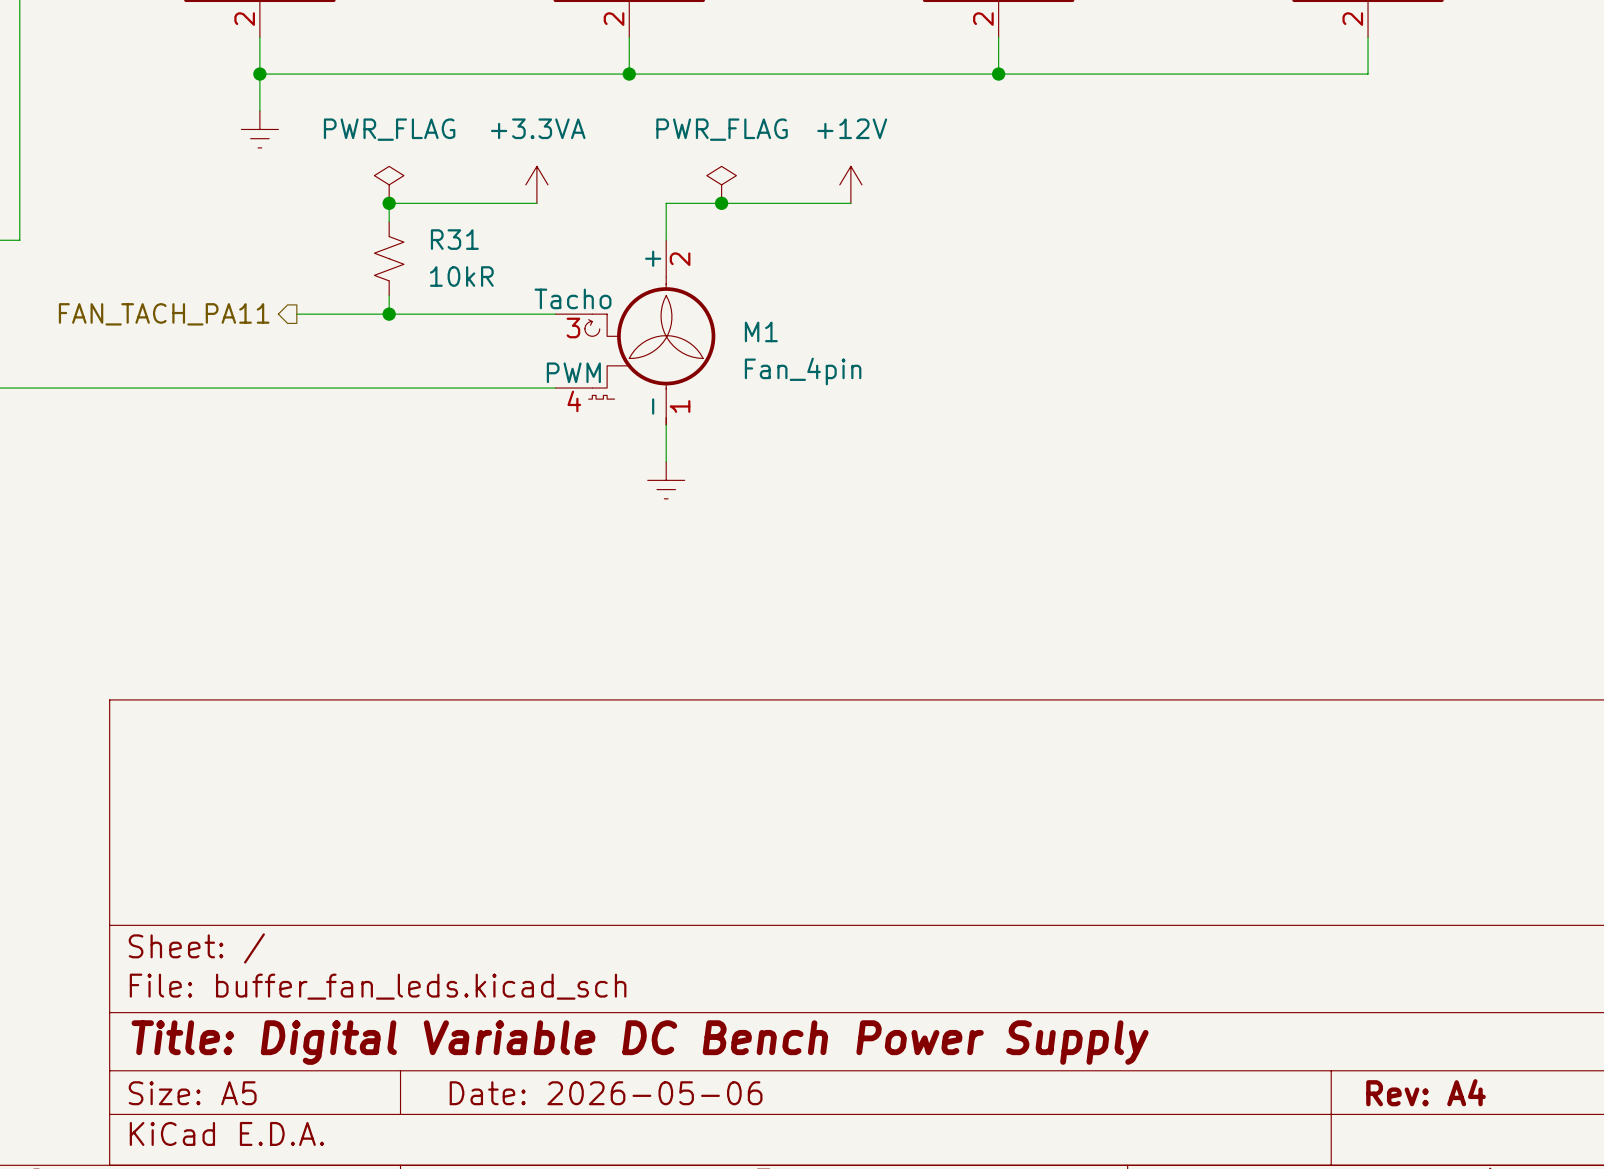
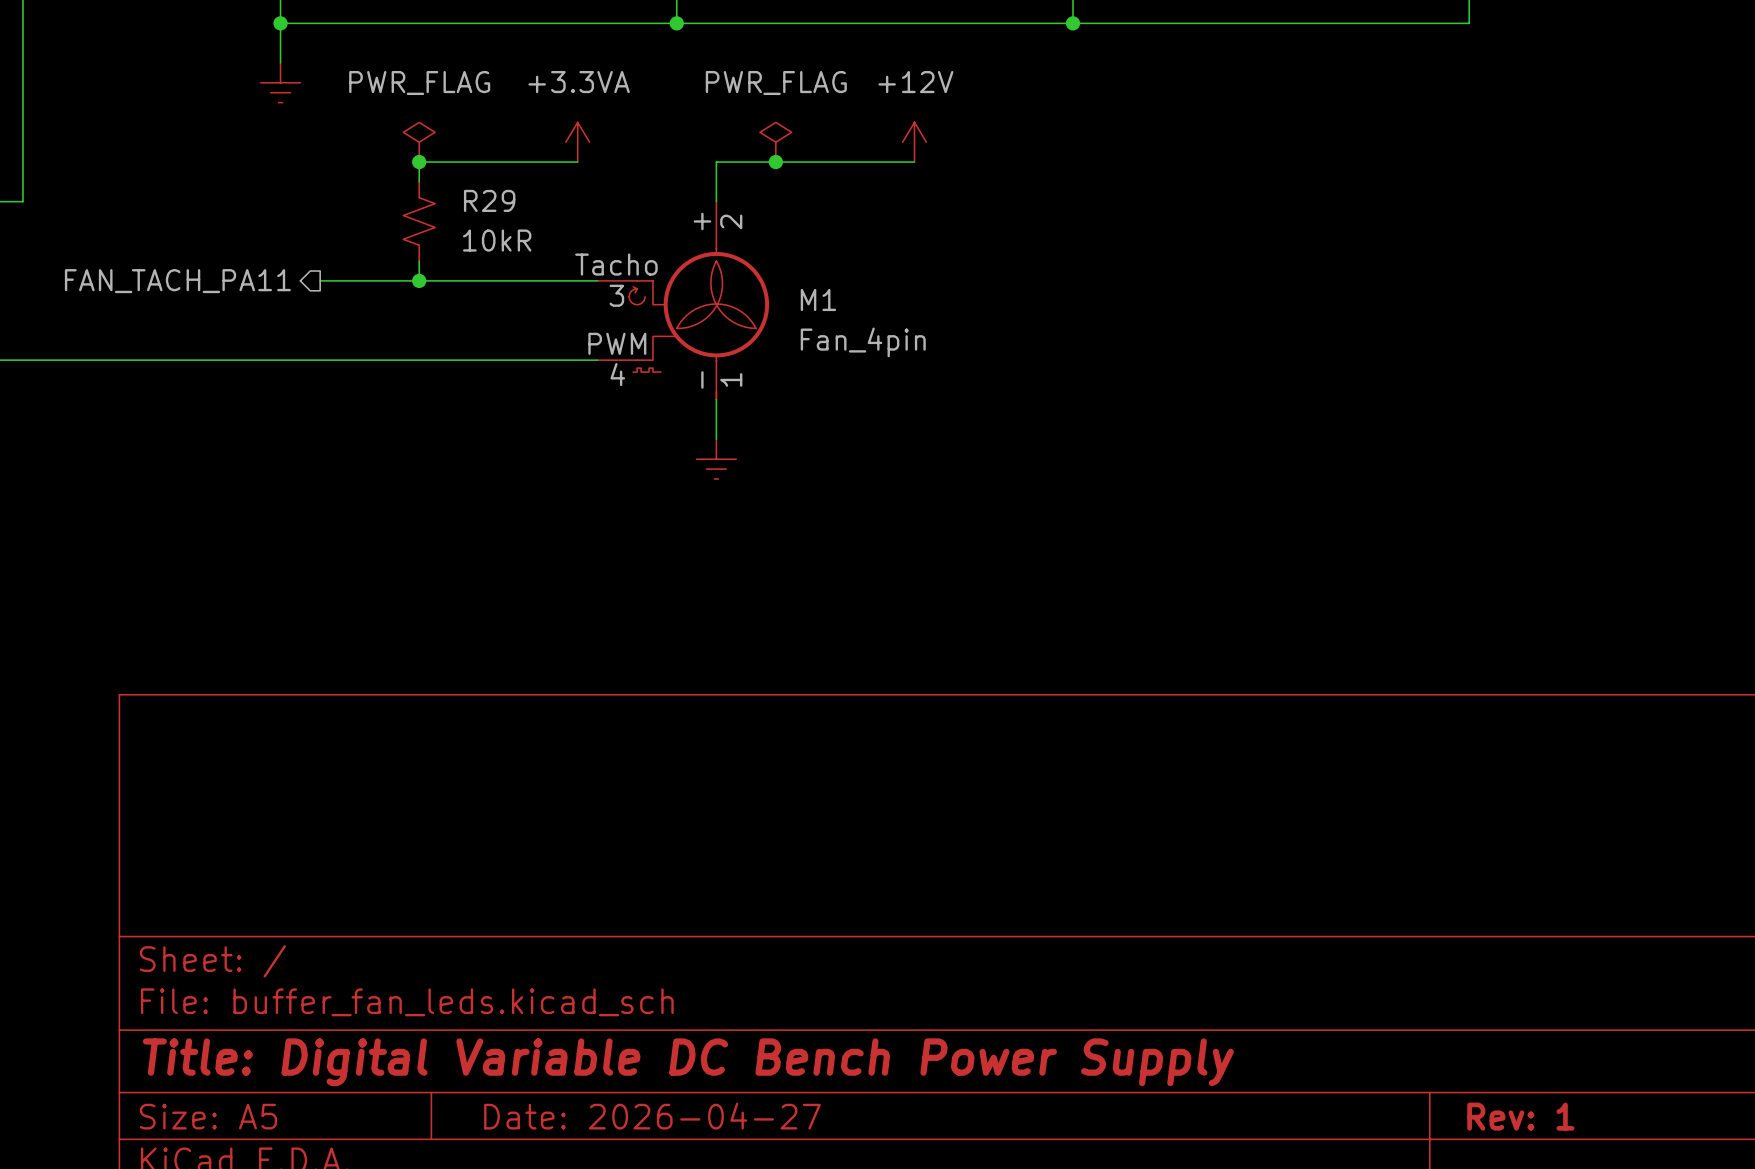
R31 name: R31 (454, 239) -> R29 (489, 200)
title block: Rev: A4 (1426, 1092) -> Rev: 1 (1520, 1116)
title block: Date: 2026-05-06 (606, 1093) -> Date: 2026-04-27 (652, 1116)

